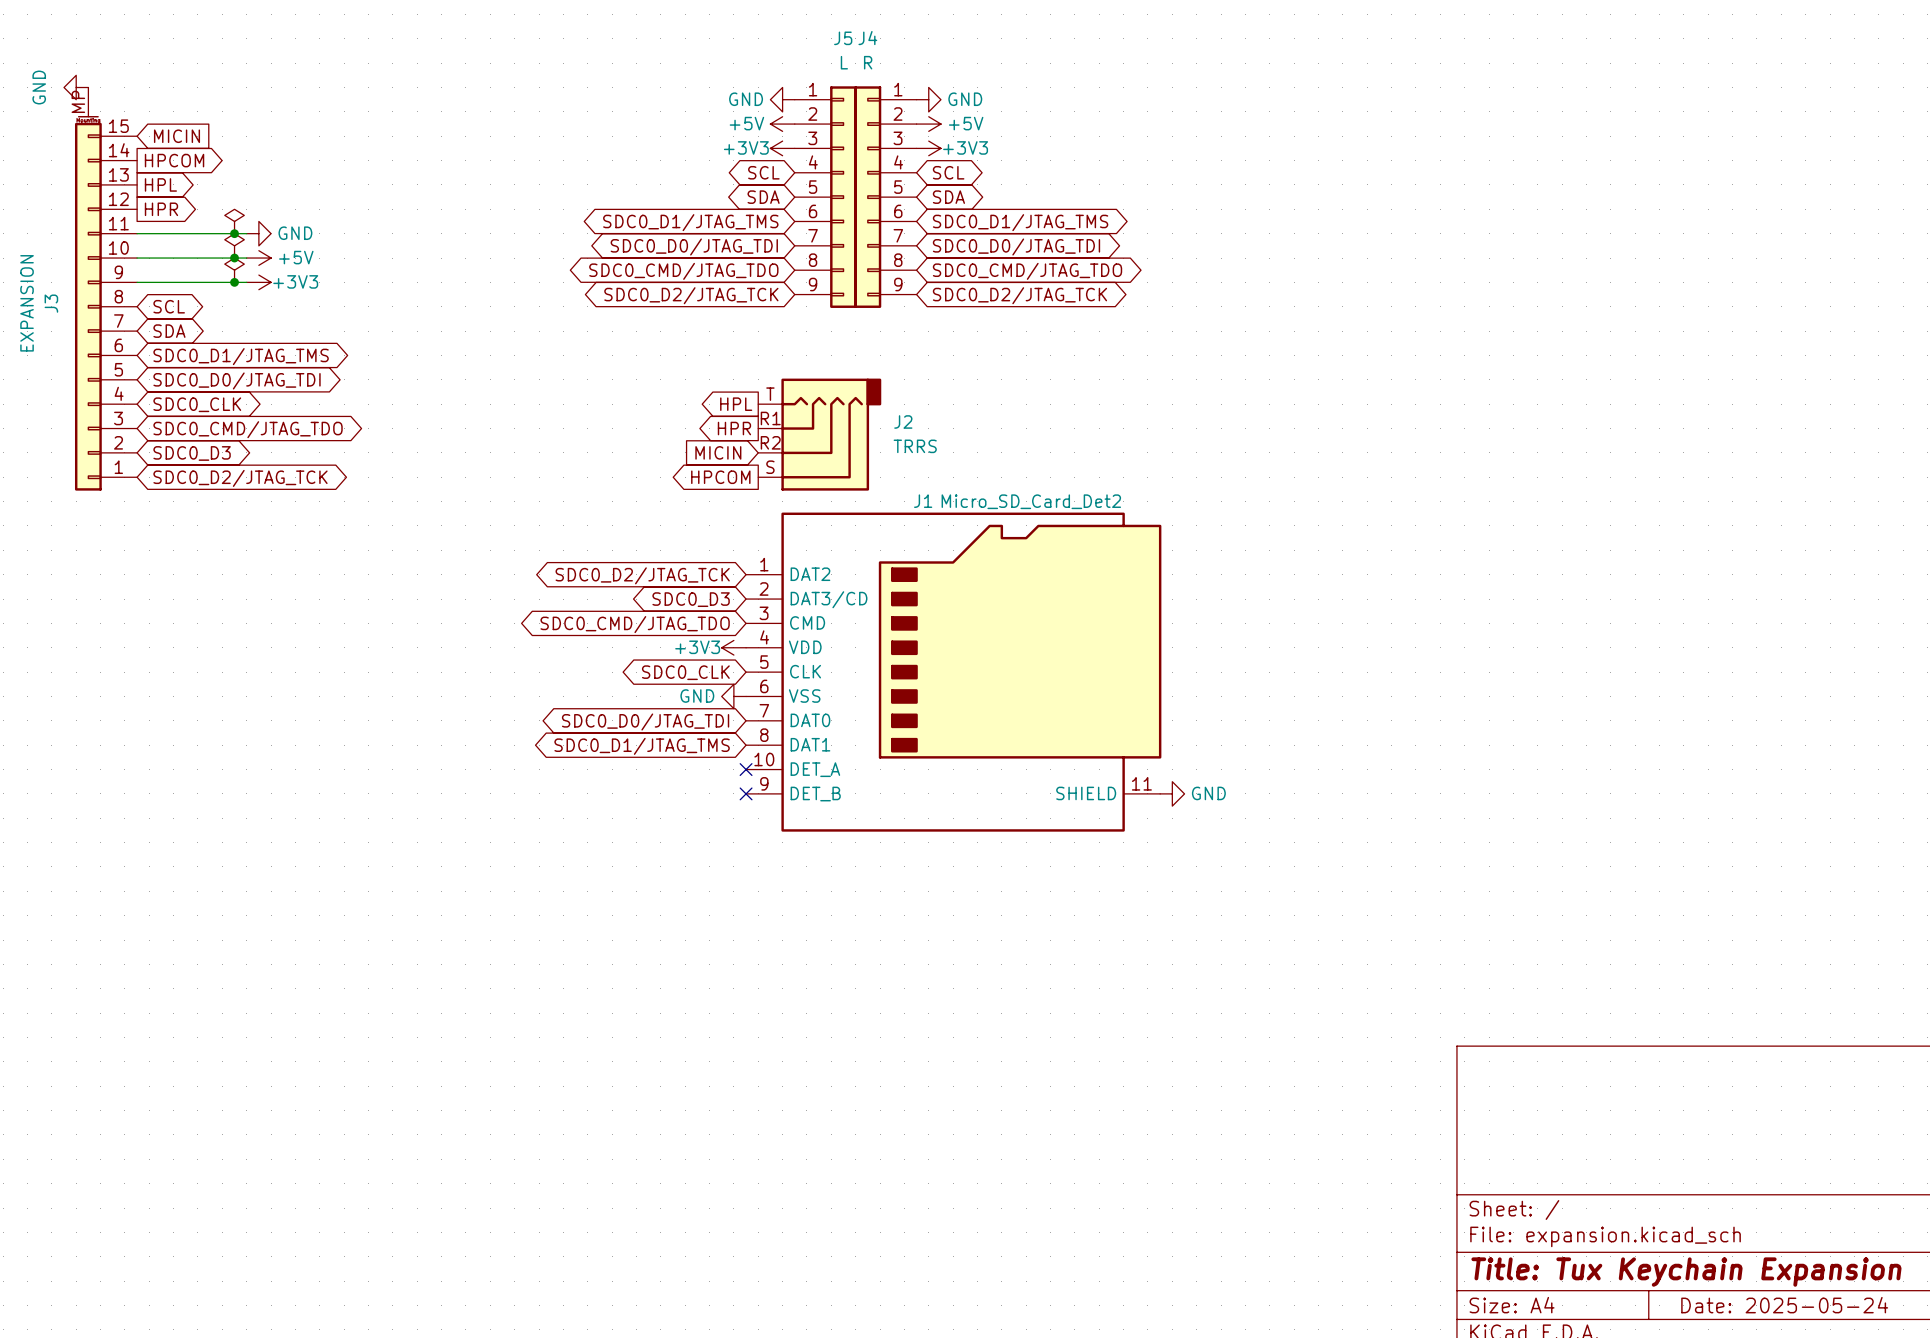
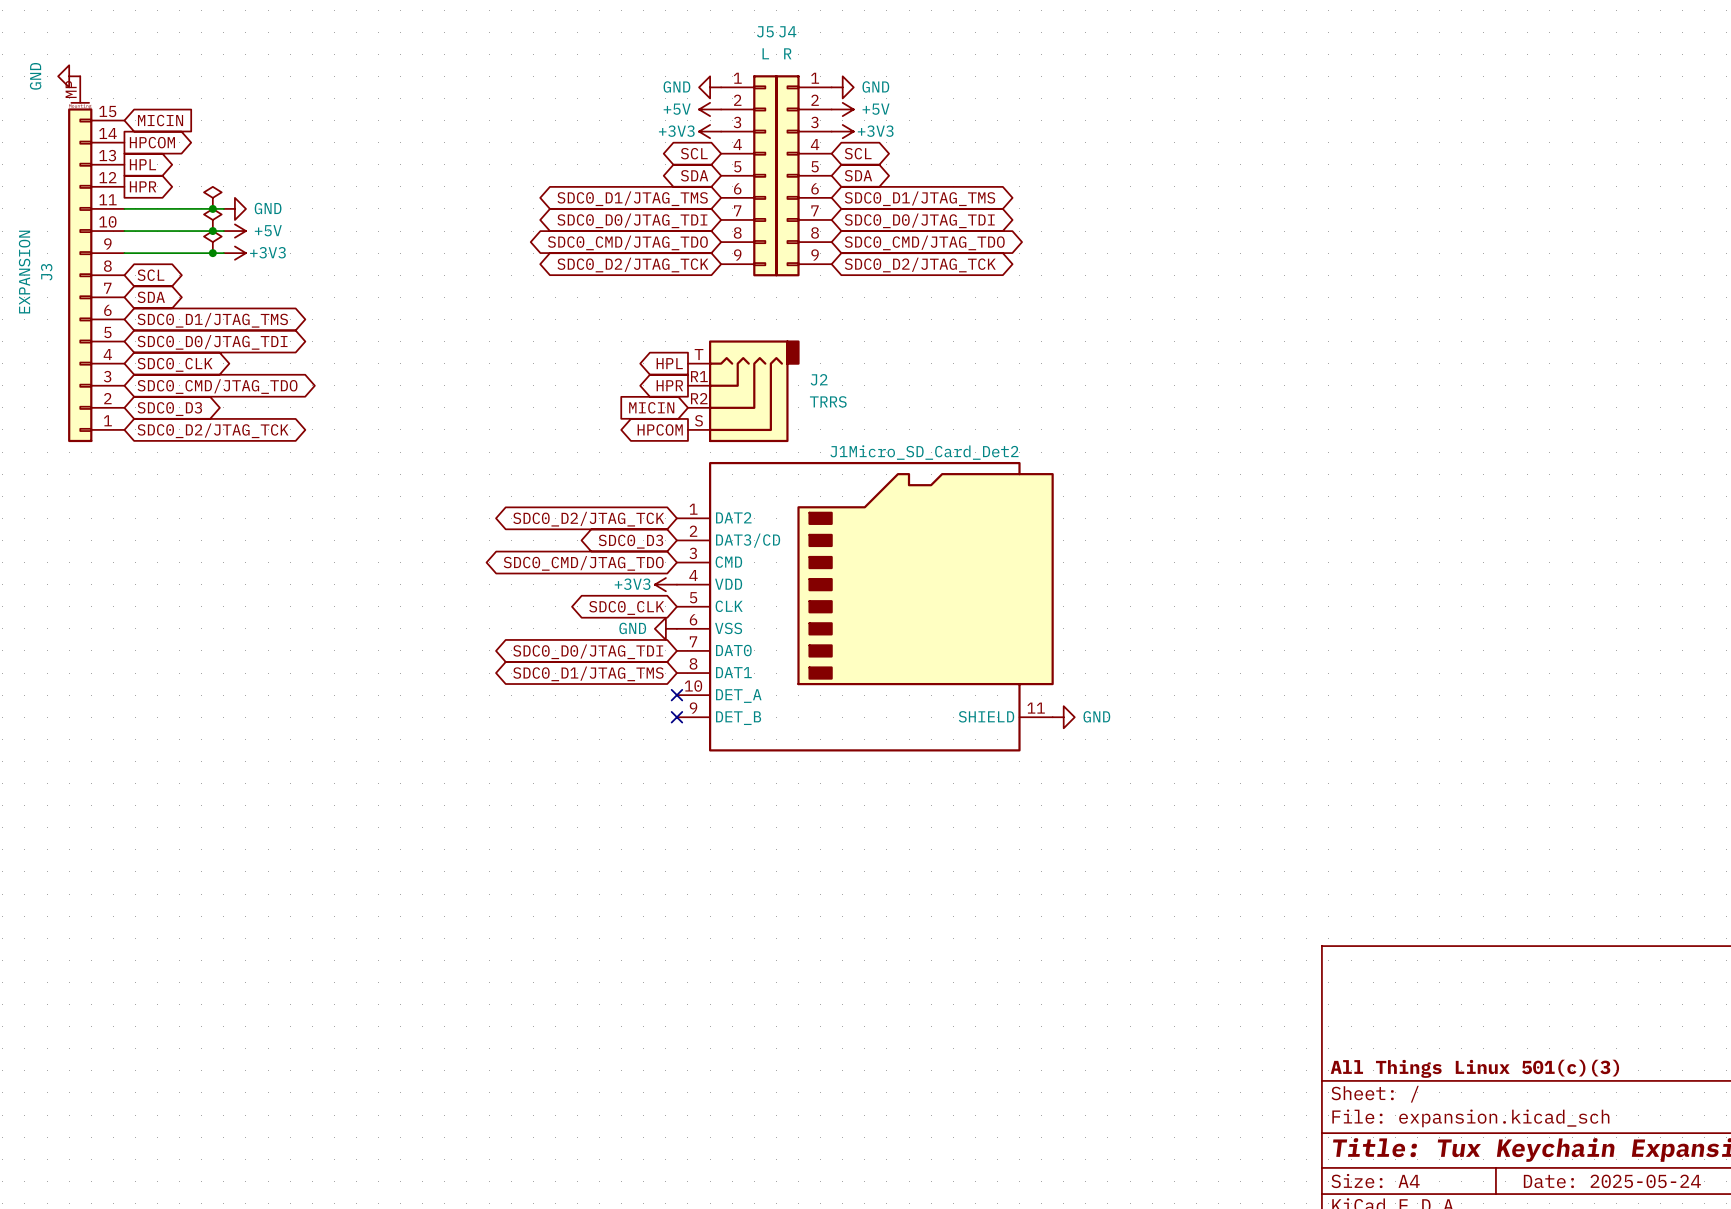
title block: none -> All Things Linux 501(c)(3) (1474, 1068)

